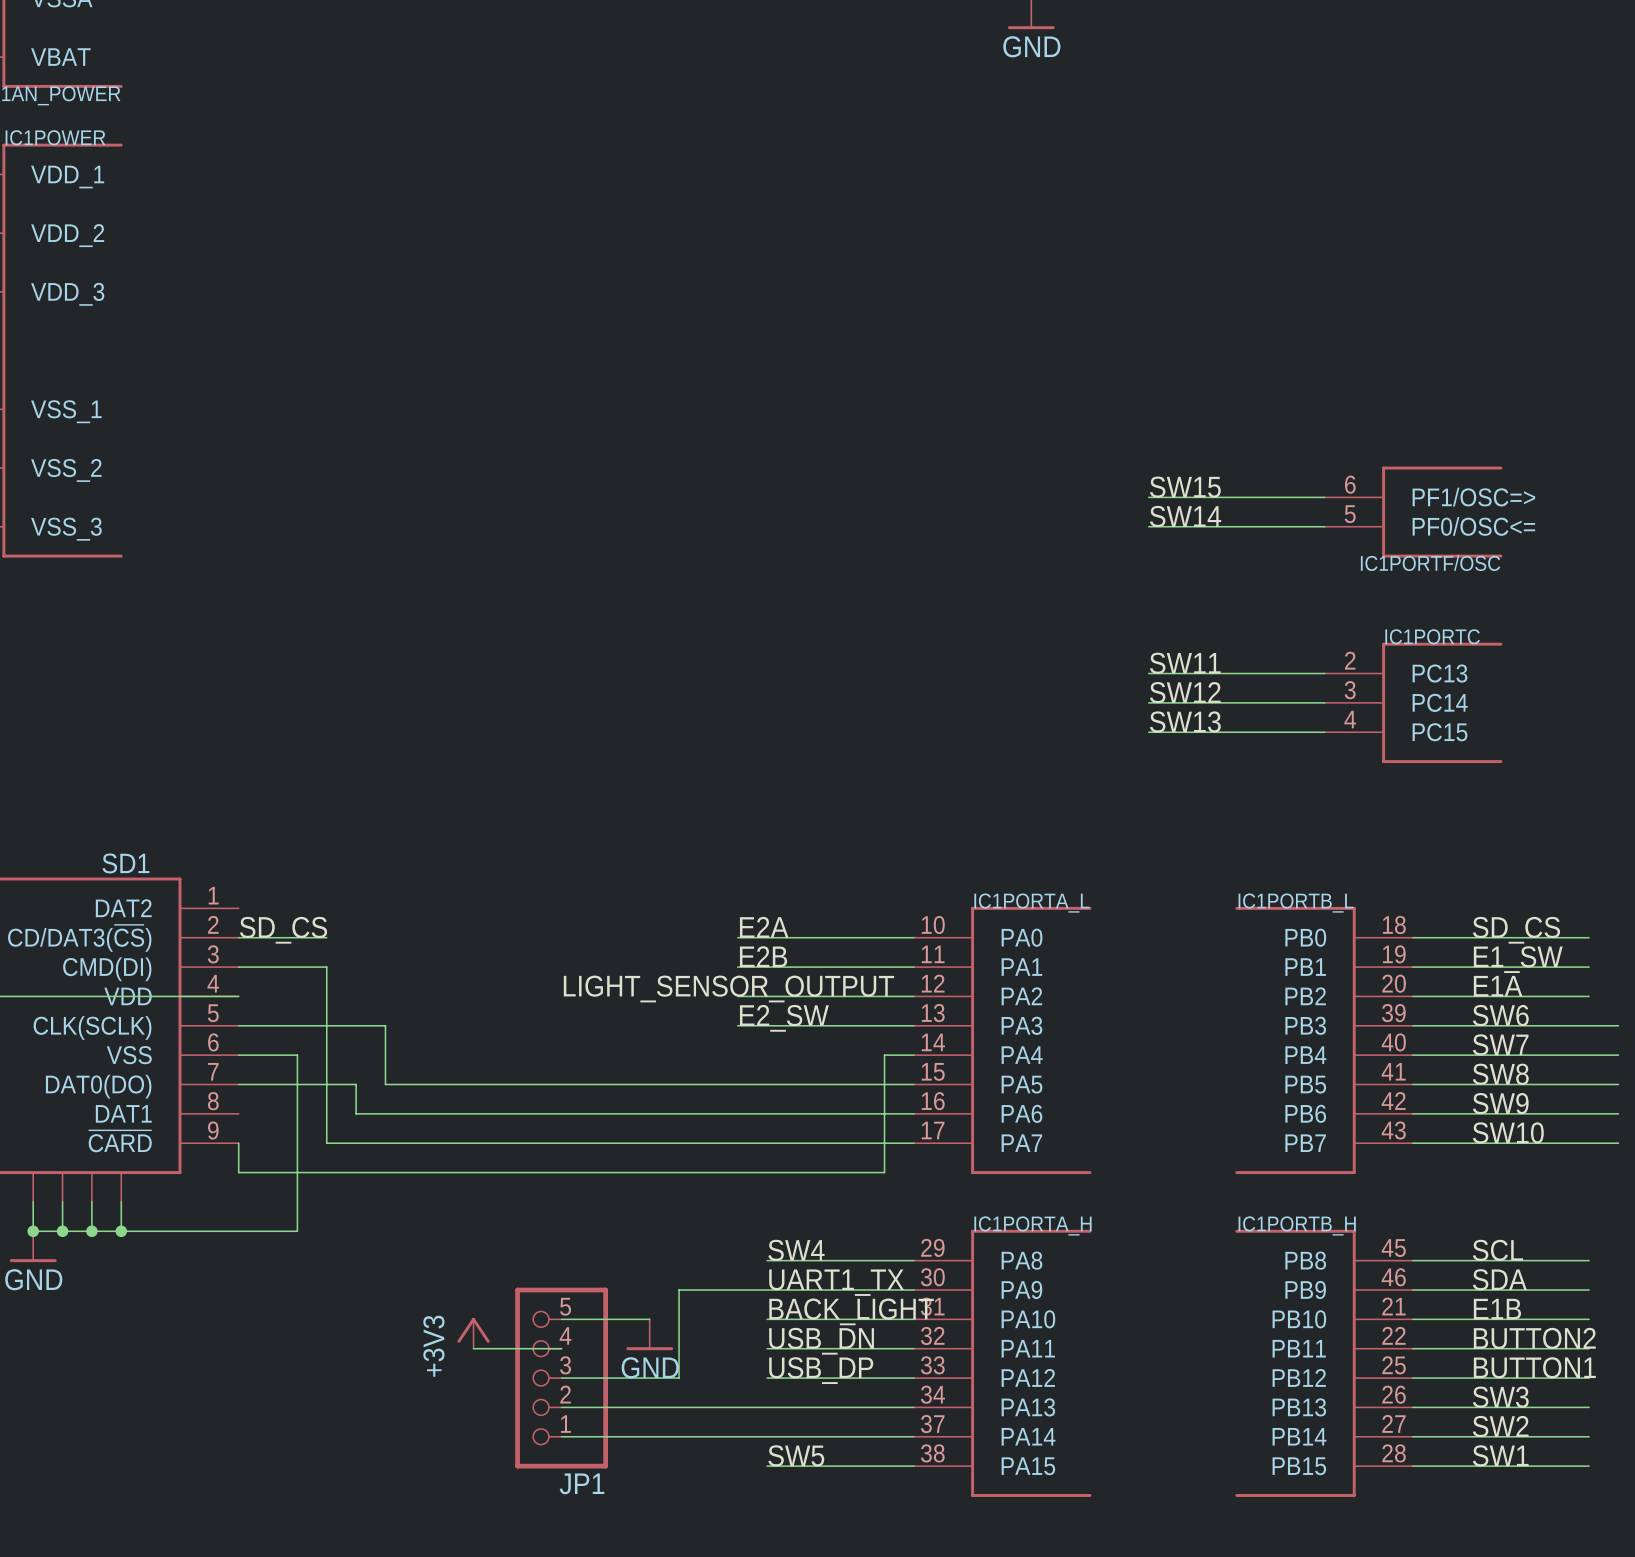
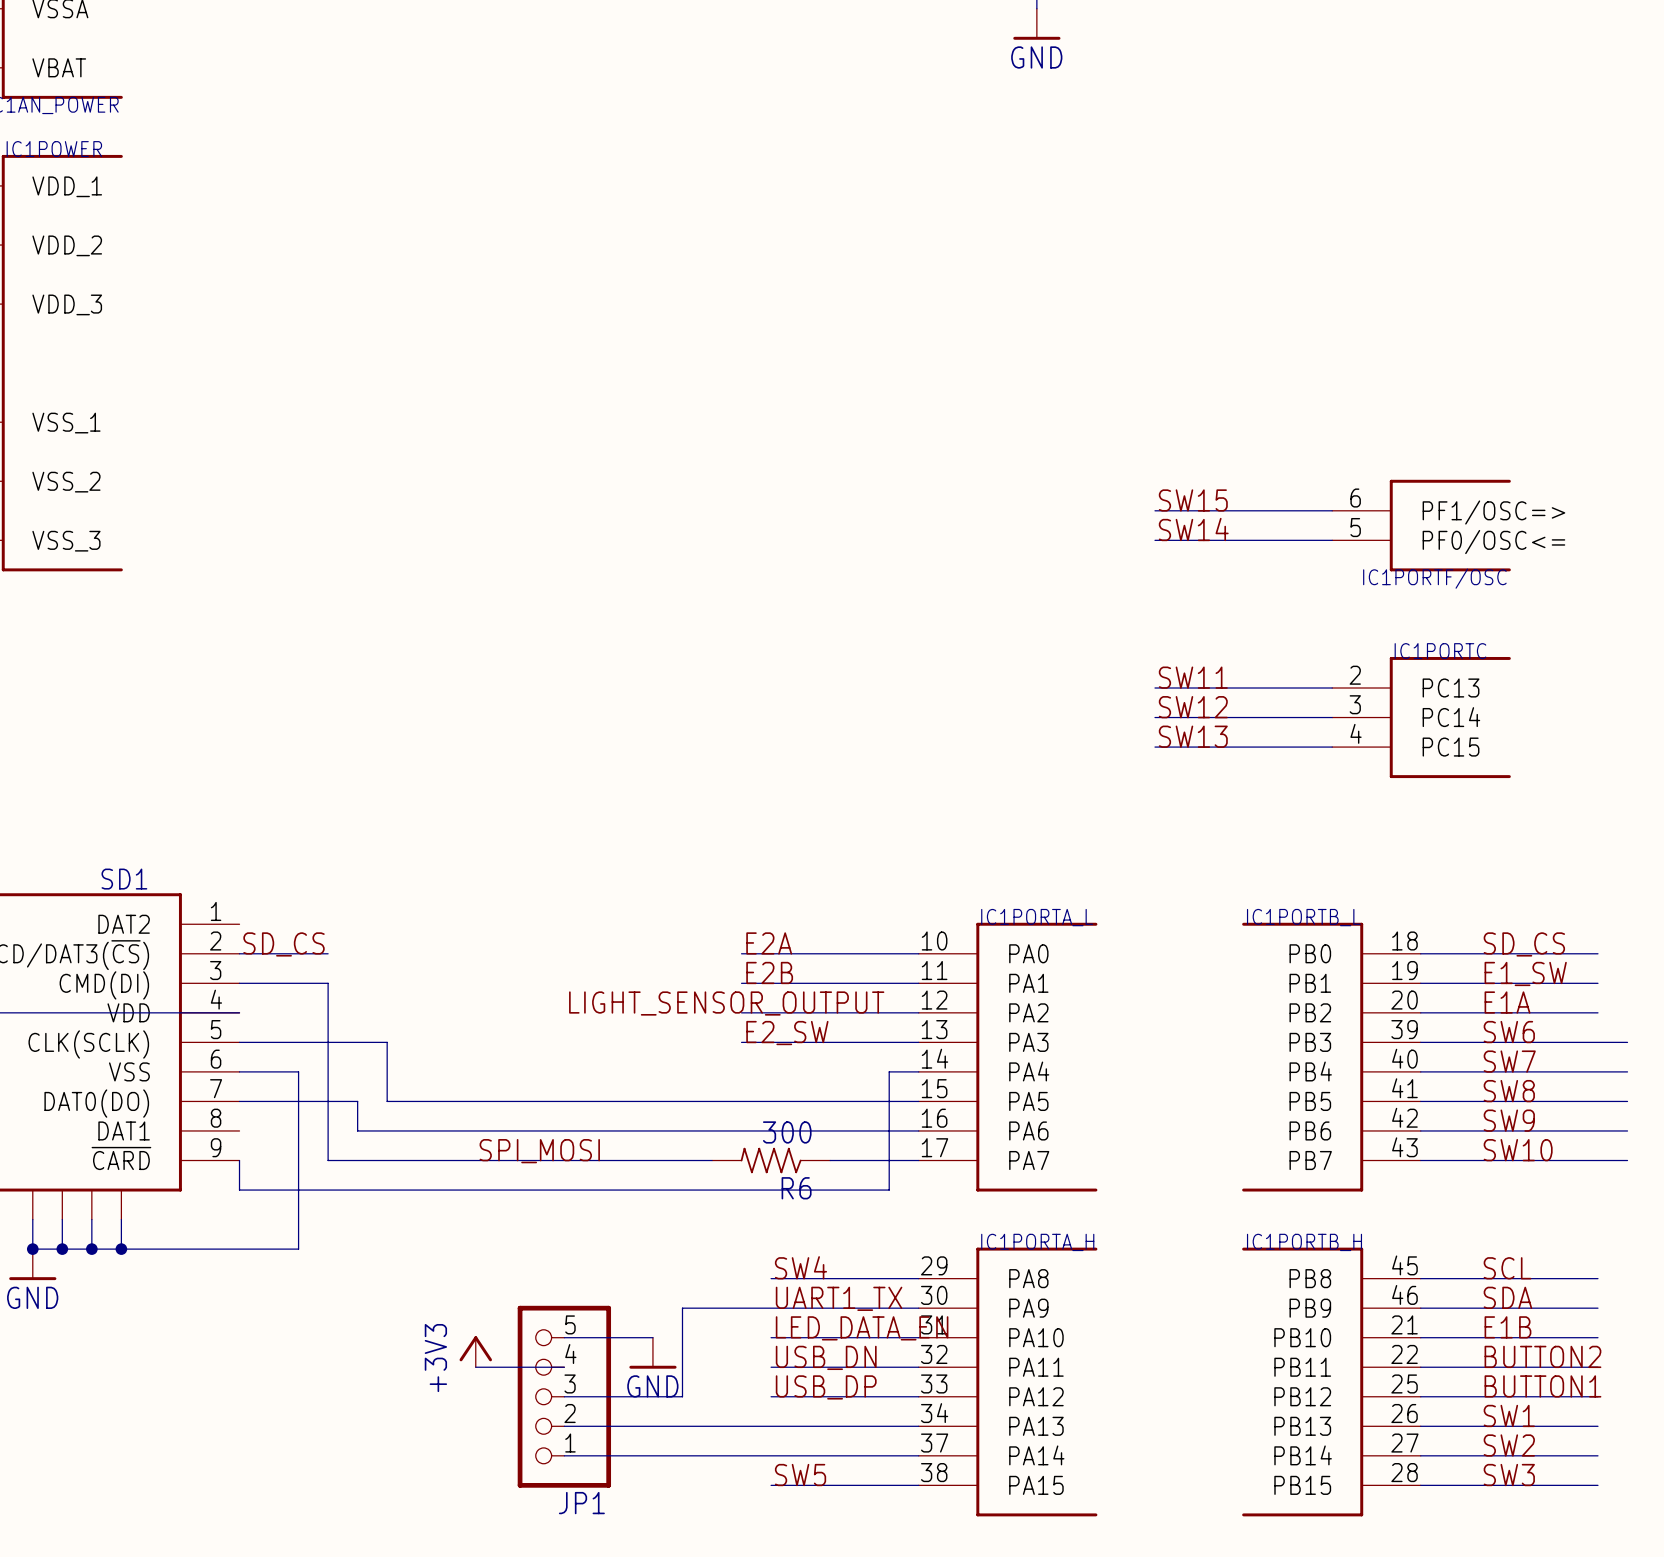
label: none -> SPI_MOSI (539, 1151)
R6: none -> 300 (771, 1160)
label: BACK_LIGHT (851, 1311) -> LED_DATA_EN (862, 1328)
label: SW3 (1500, 1397) -> SW1 (1509, 1415)
label: SW1 (1500, 1455) -> SW3 (1509, 1475)

